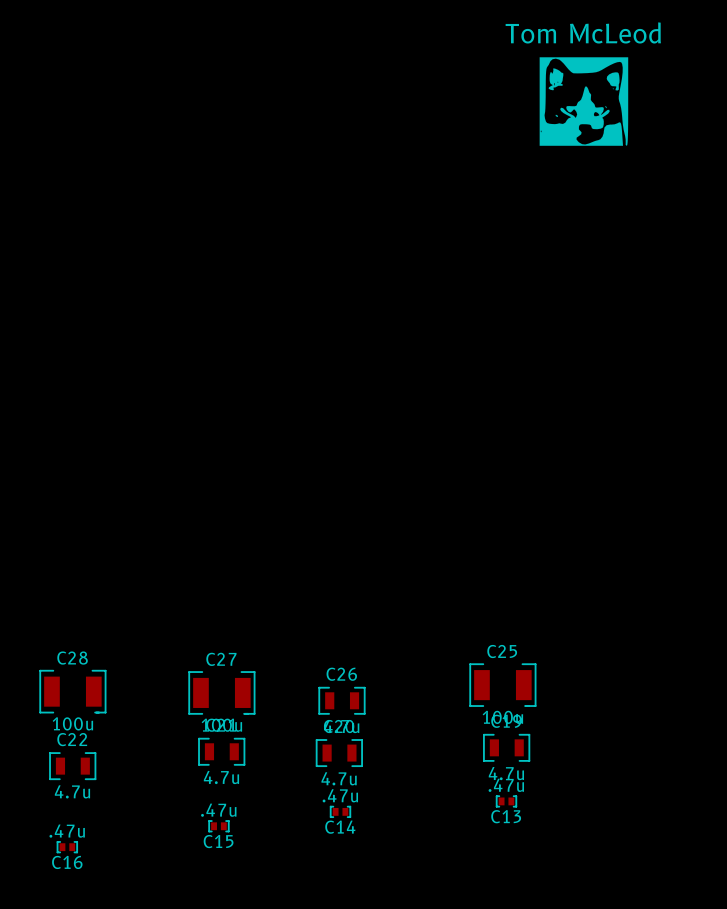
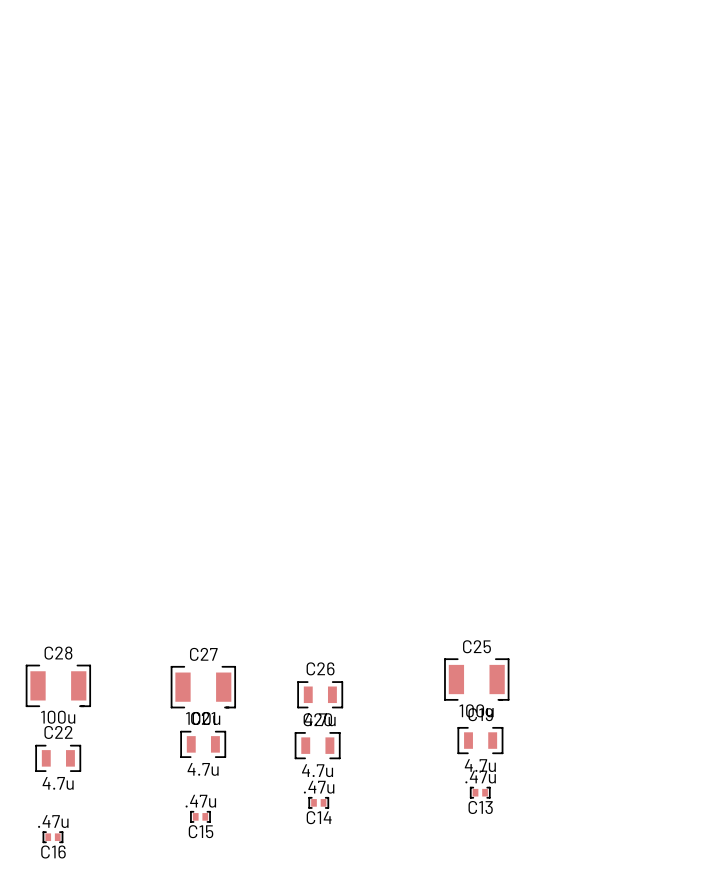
text: Tom McLeod (583, 32) -> none
drawing: [539, 57, 629, 146] -> none

